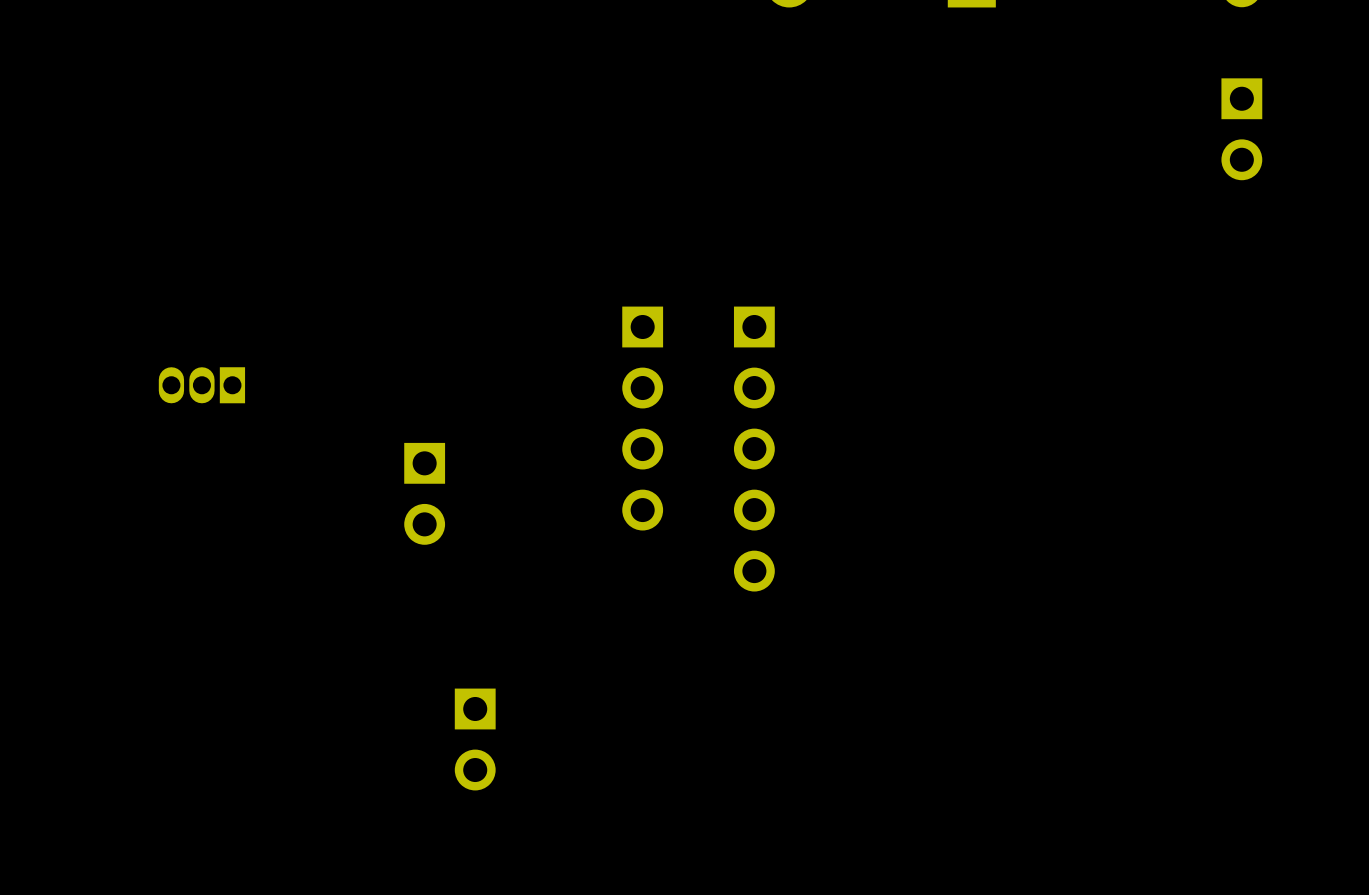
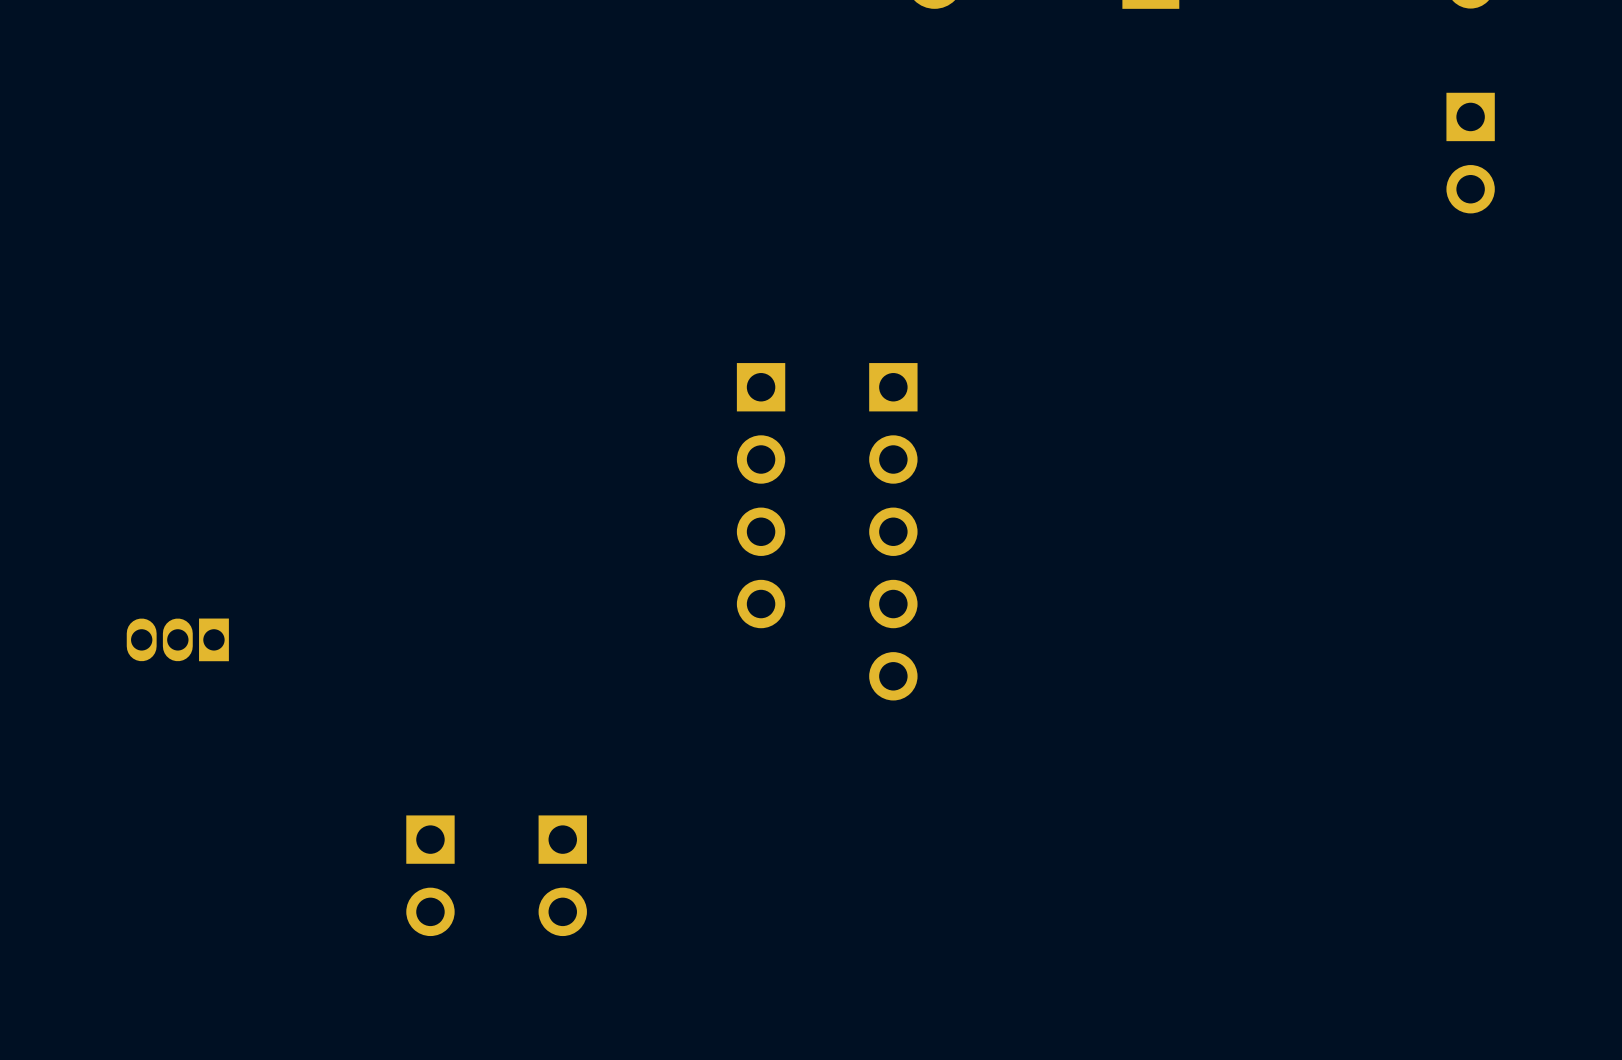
part position: (201, 385) -> (177, 639)
part position: (424, 493) -> (430, 875)

